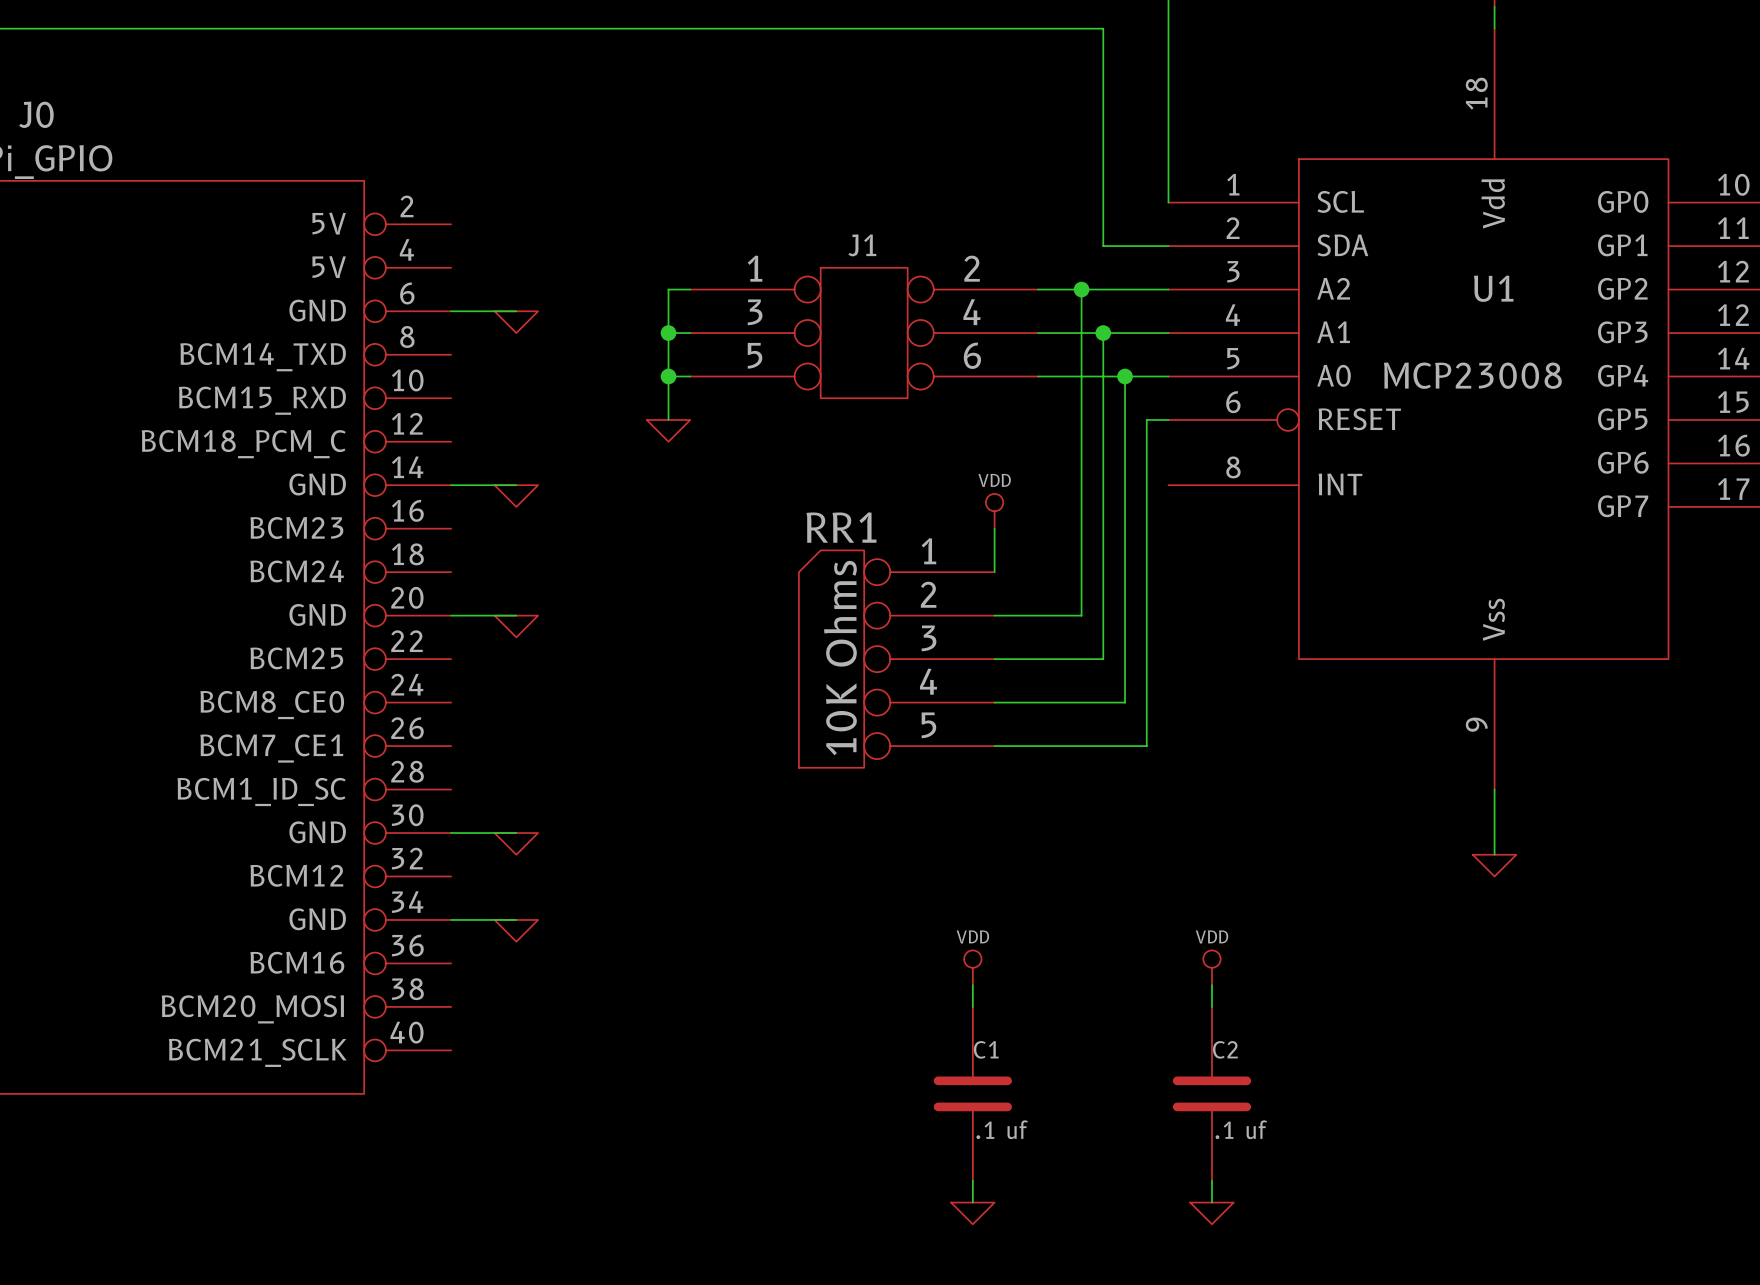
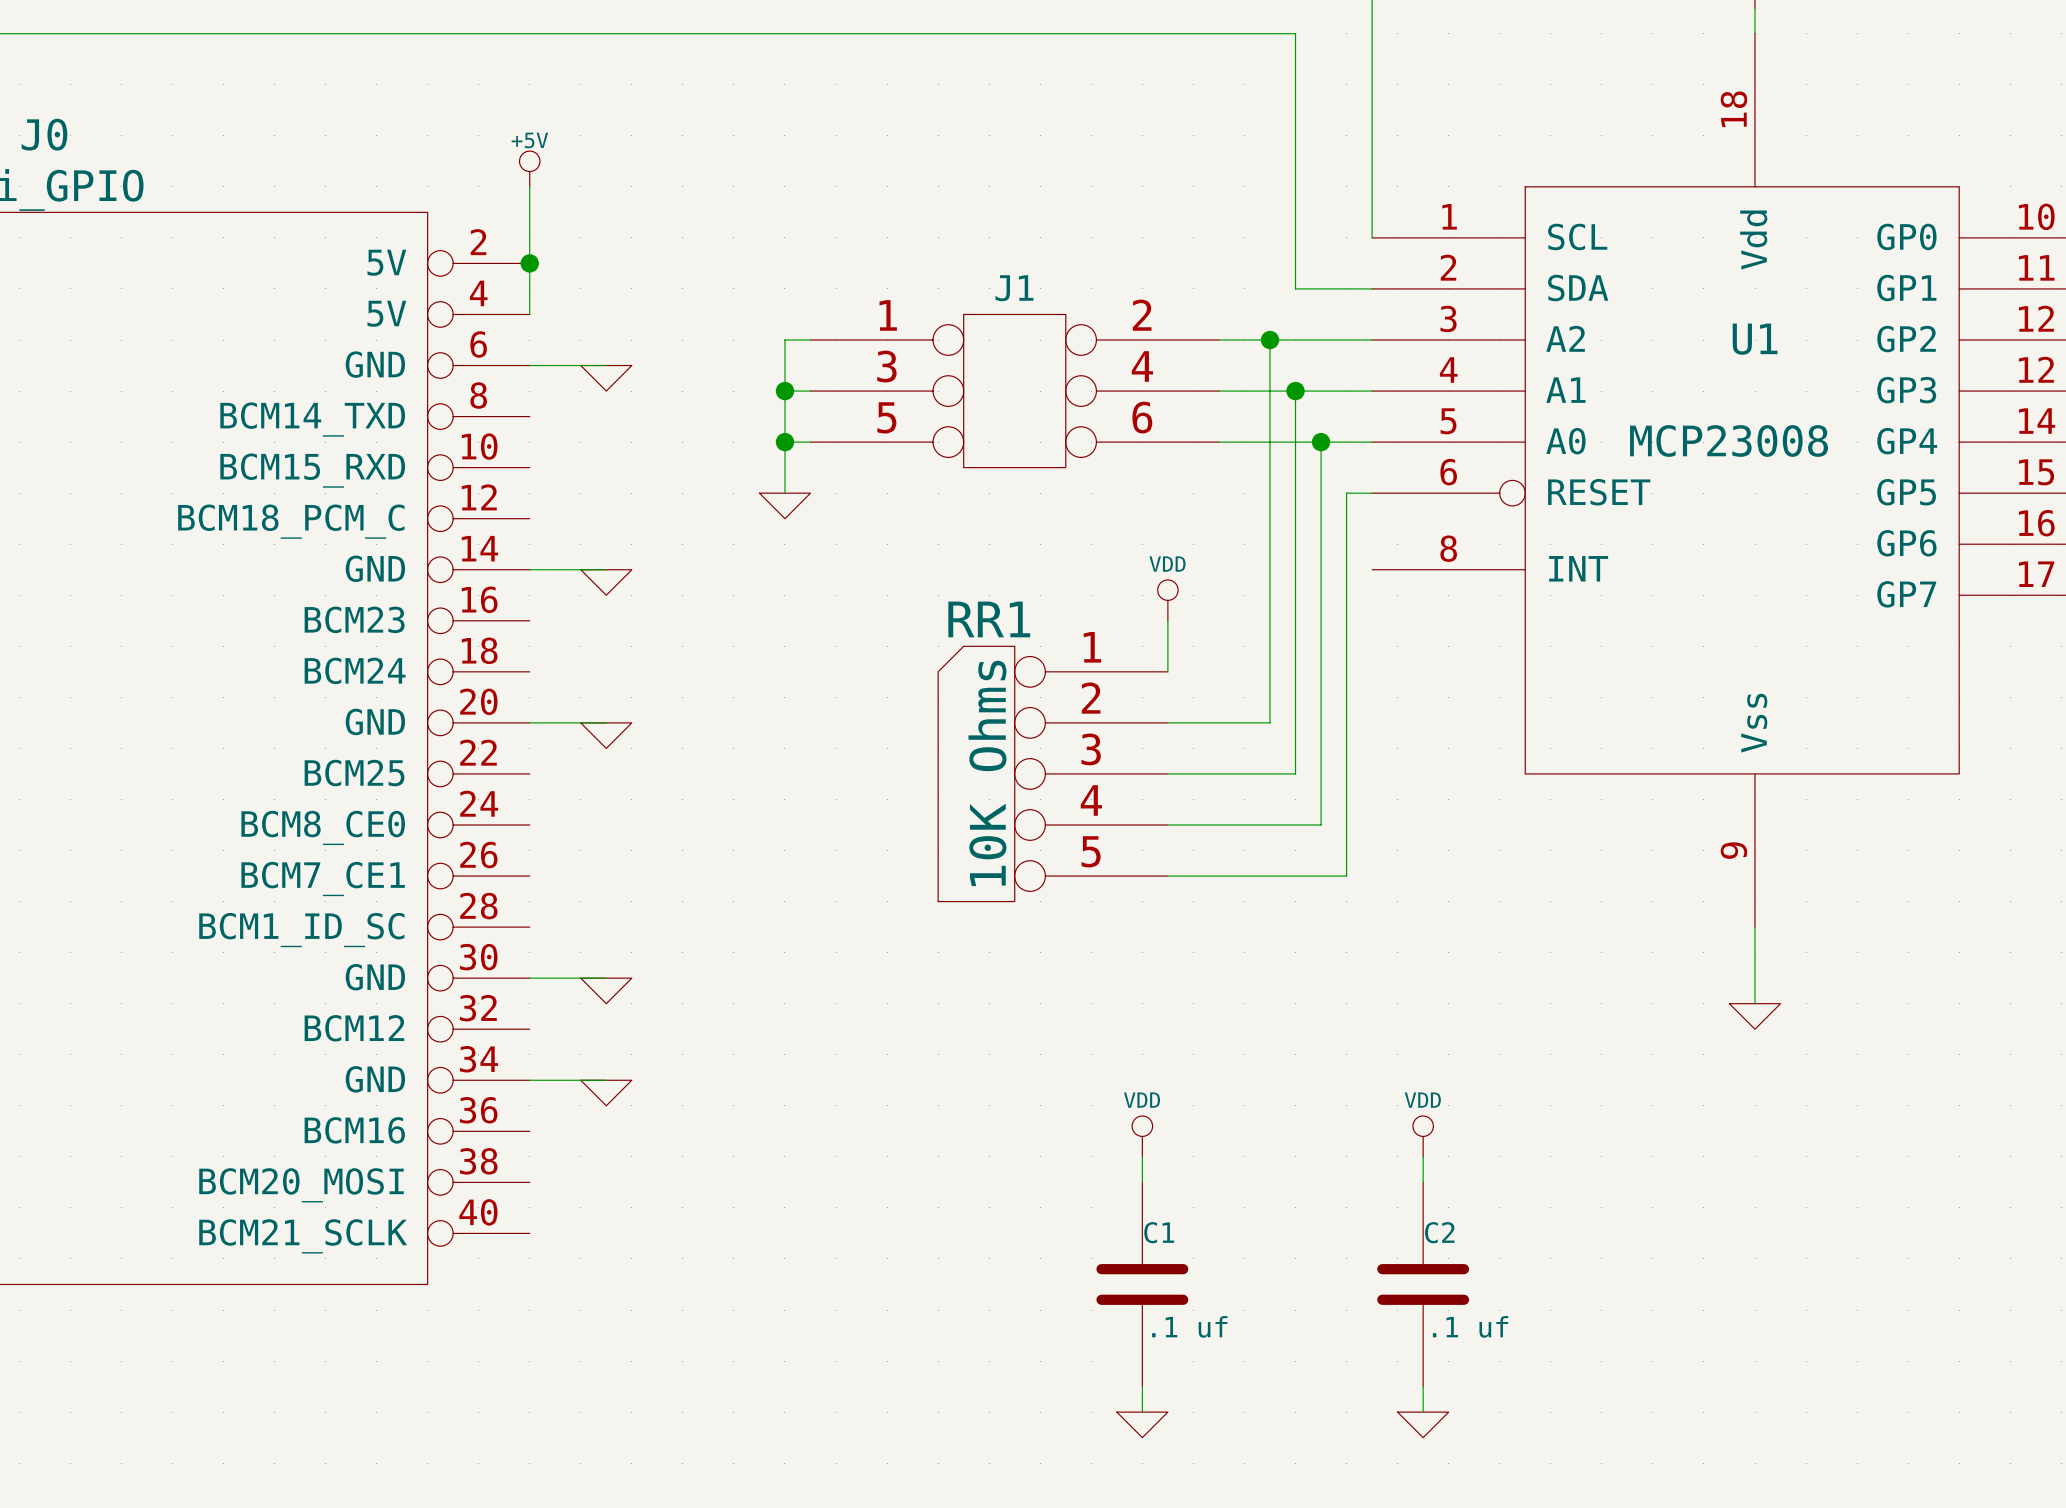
power symbol: none -> +5V (529, 168)
wire: none -> (529, 186) (529, 314)
junction: none -> (529, 263)

